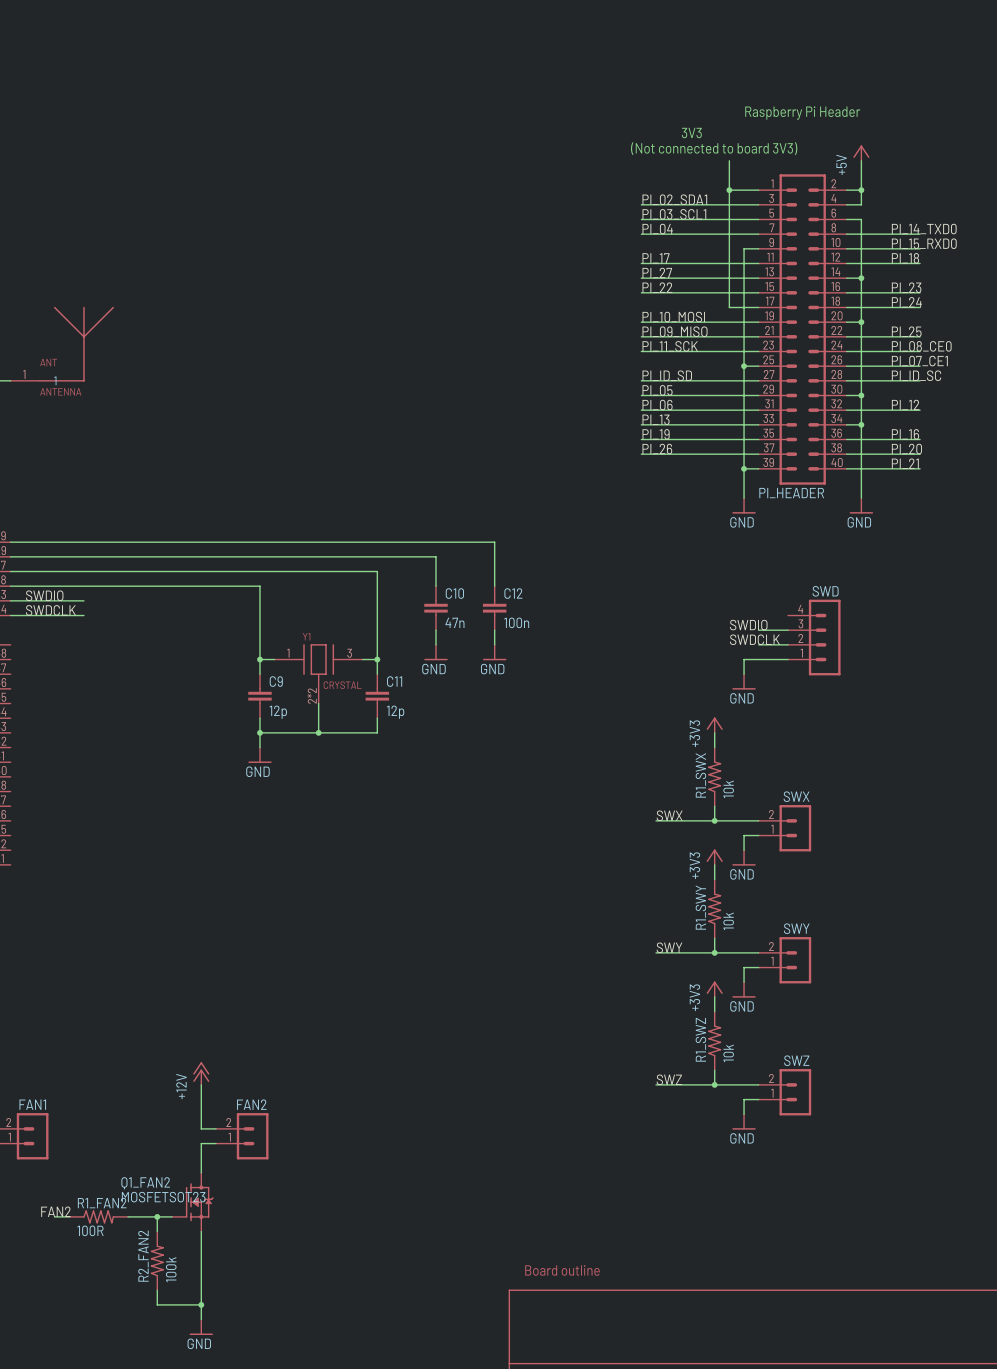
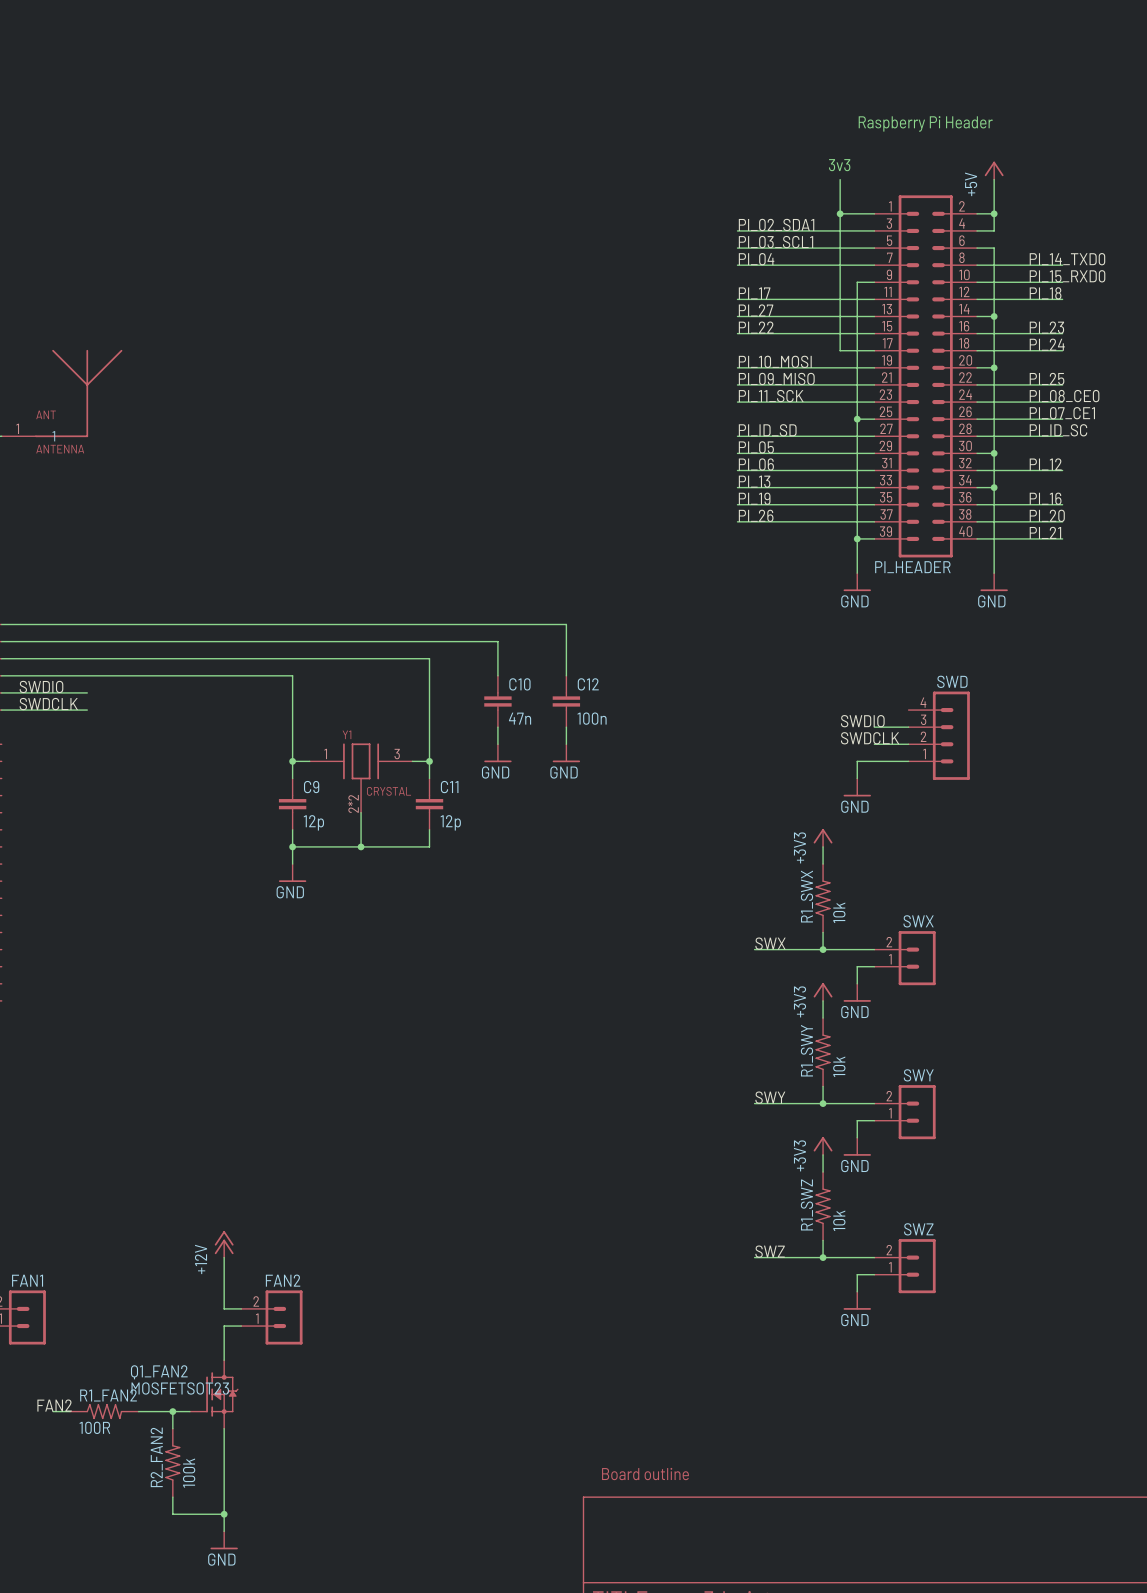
text: 3V3 (691, 133) -> none
text: (Not connected to board 3V3) (714, 148) -> none
text: none -> 3v3 (839, 165)

